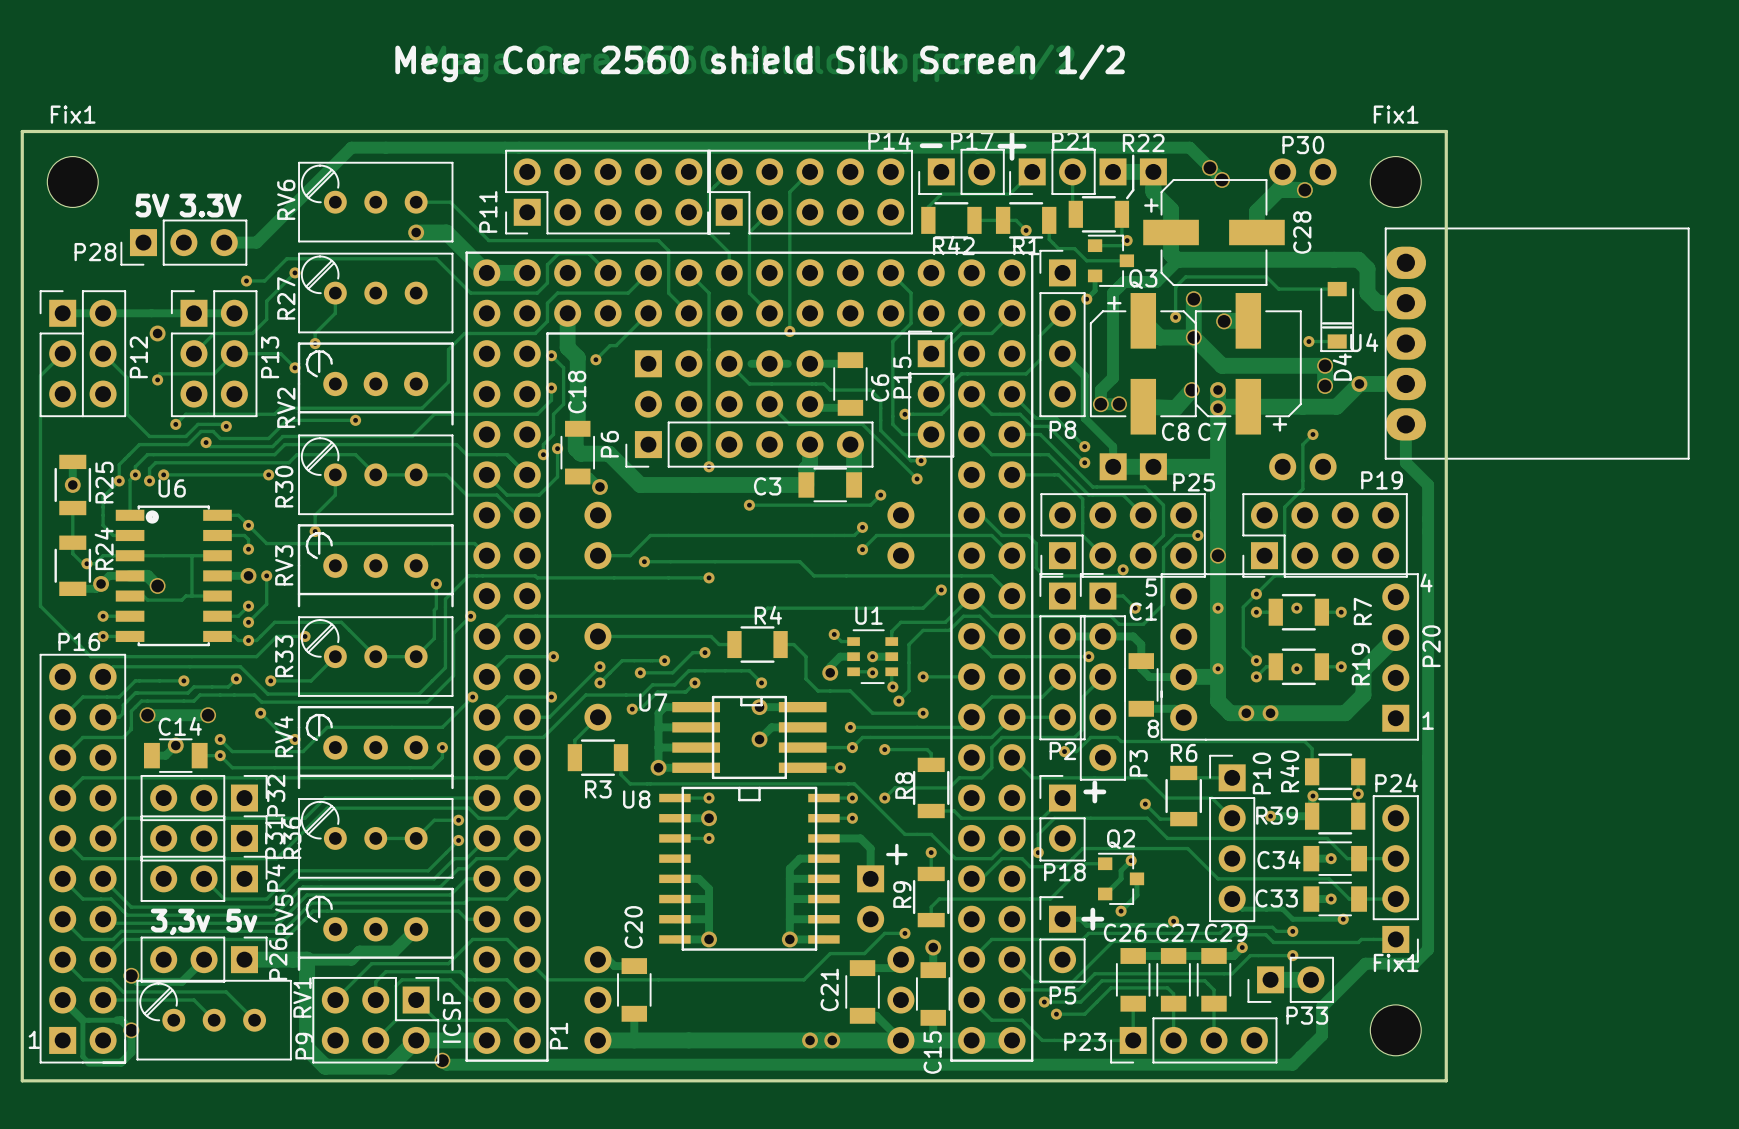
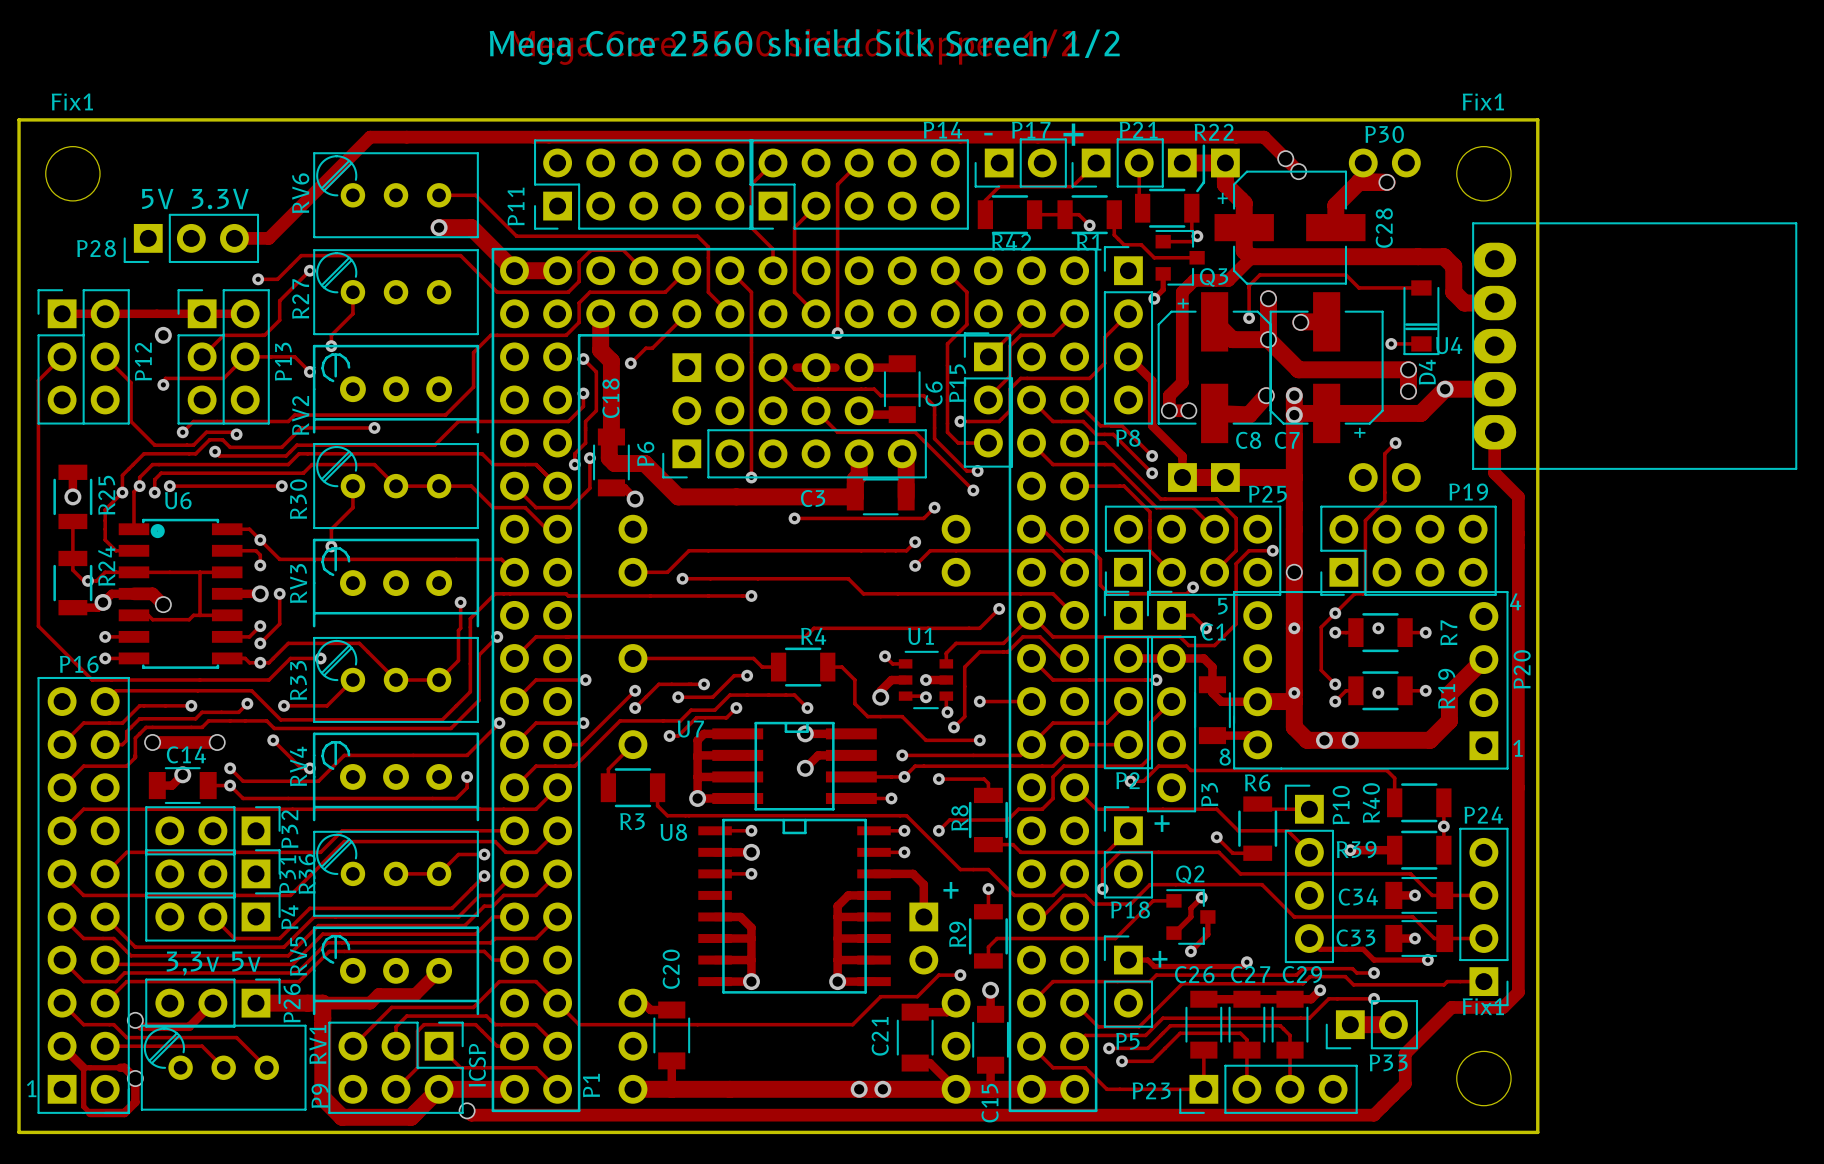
via: (1312, 796) -> none

